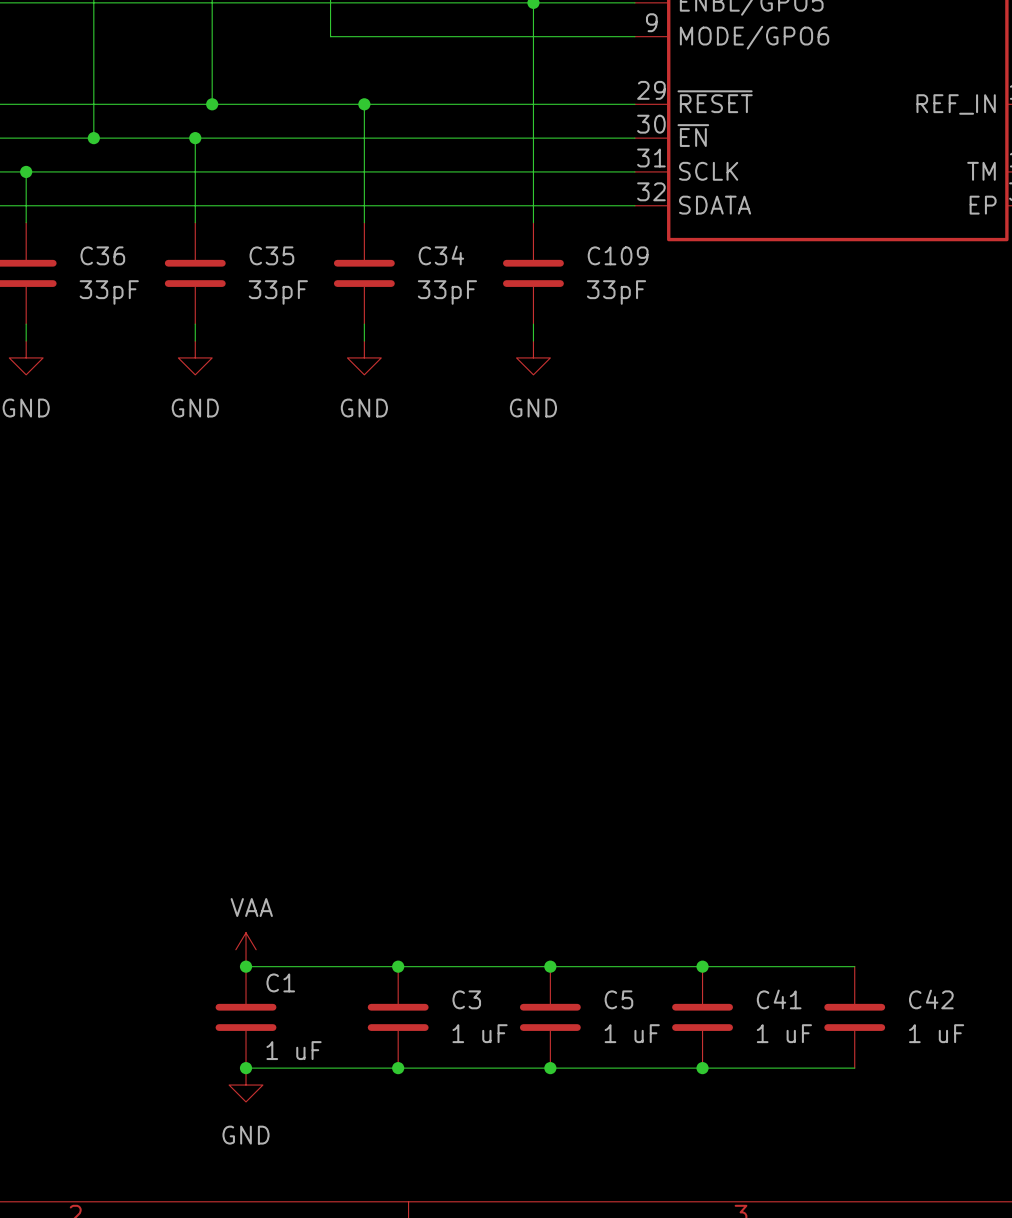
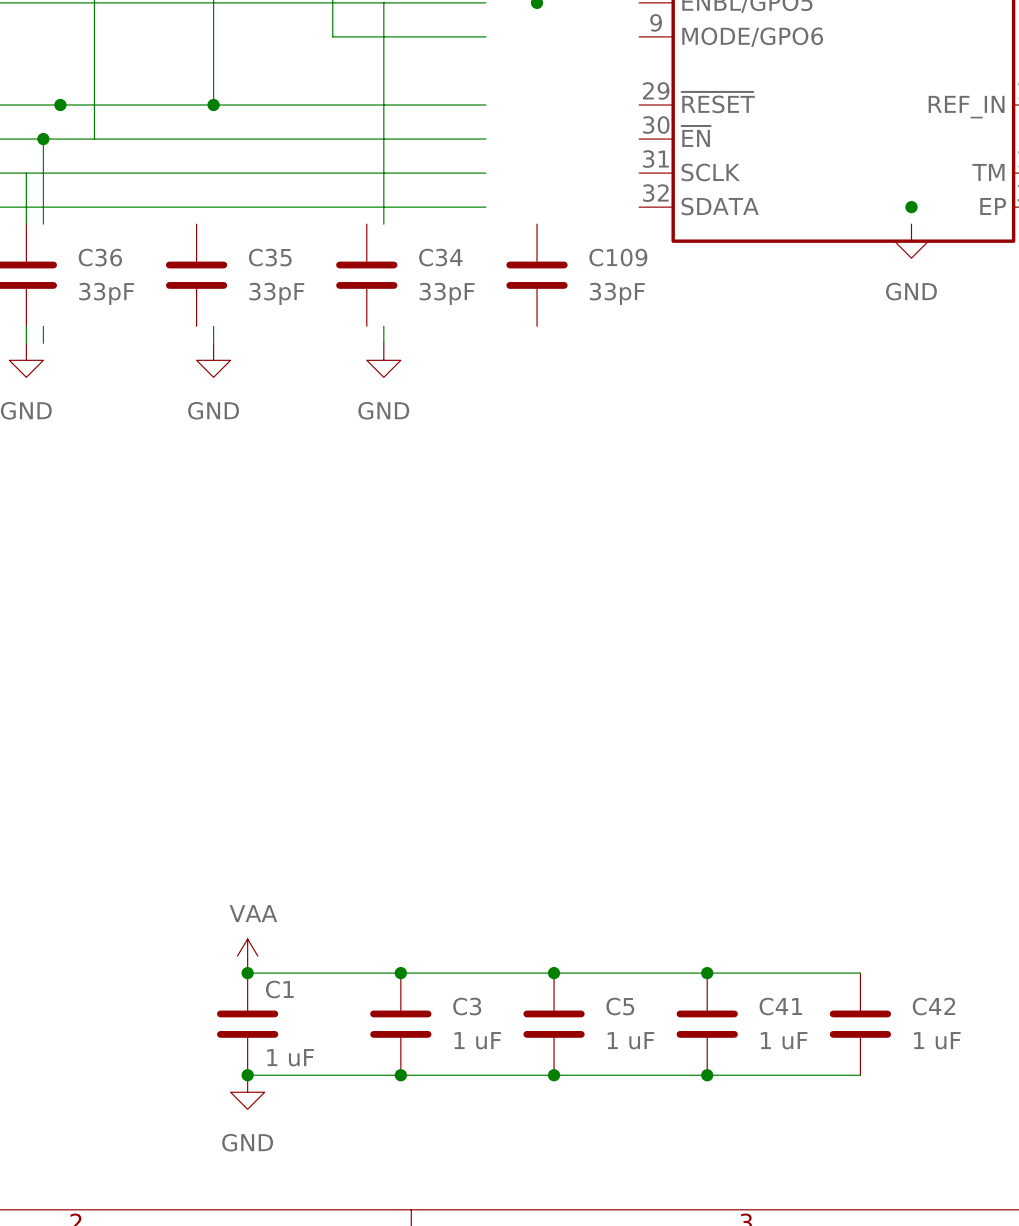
wire: (482, 2) (634, 2) -> none
wire: (533, 2) (533, 222) -> (383, 2) (383, 224)
wire: (482, 36) (634, 36) -> none
junction: none -> (60, 105)
wire: (364, 104) (364, 222) -> none
junction: (364, 104) -> none
wire: (482, 104) (634, 104) -> none
junction: none -> (43, 139)
junction: (93, 138) -> none
wire: (195, 138) (195, 222) -> (43, 139) (43, 224)
junction: (195, 138) -> none
wire: (482, 138) (634, 138) -> none
junction: (26, 171) -> none
wire: (482, 171) (634, 171) -> none
wire: (482, 205) (634, 205) -> none
junction: none -> (911, 207)
power symbol: none -> GND (911, 241)
wire: (195, 324) (195, 341) -> (43, 326) (43, 343)
wire: (364, 324) (364, 341) -> (213, 326) (213, 343)
wire: (533, 324) (533, 341) -> (383, 326) (383, 343)
power symbol position: GND (195, 357) -> GND (213, 360)
power symbol position: GND (364, 357) -> GND (383, 360)
power symbol: GND (533, 357) -> none

